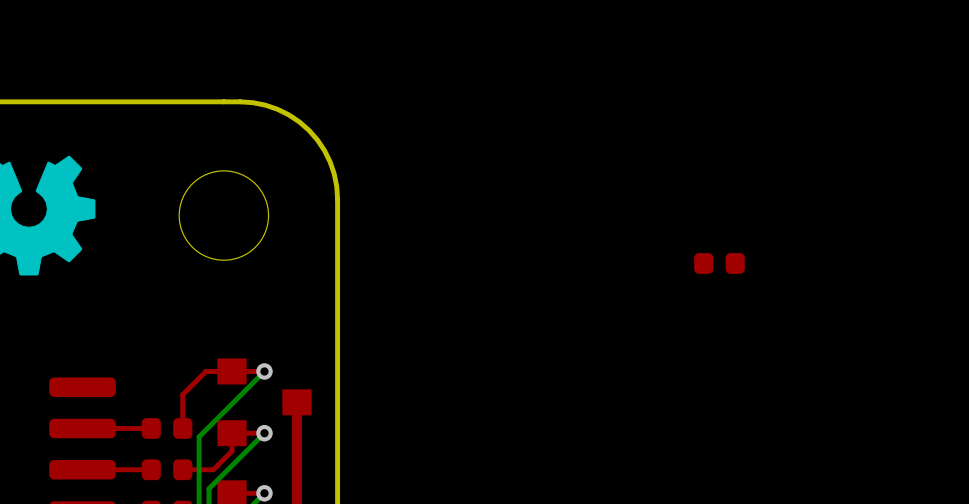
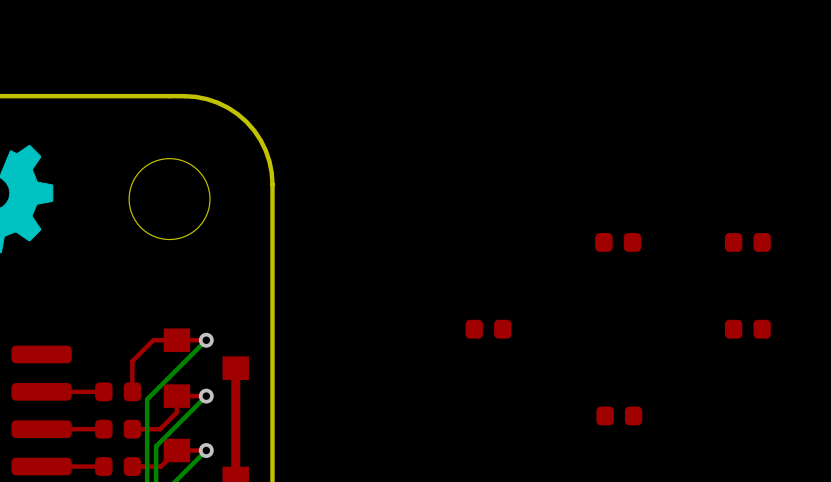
part: none -> (747, 242)
part: none -> (488, 329)
part: none -> (747, 329)
part: none -> (619, 415)

